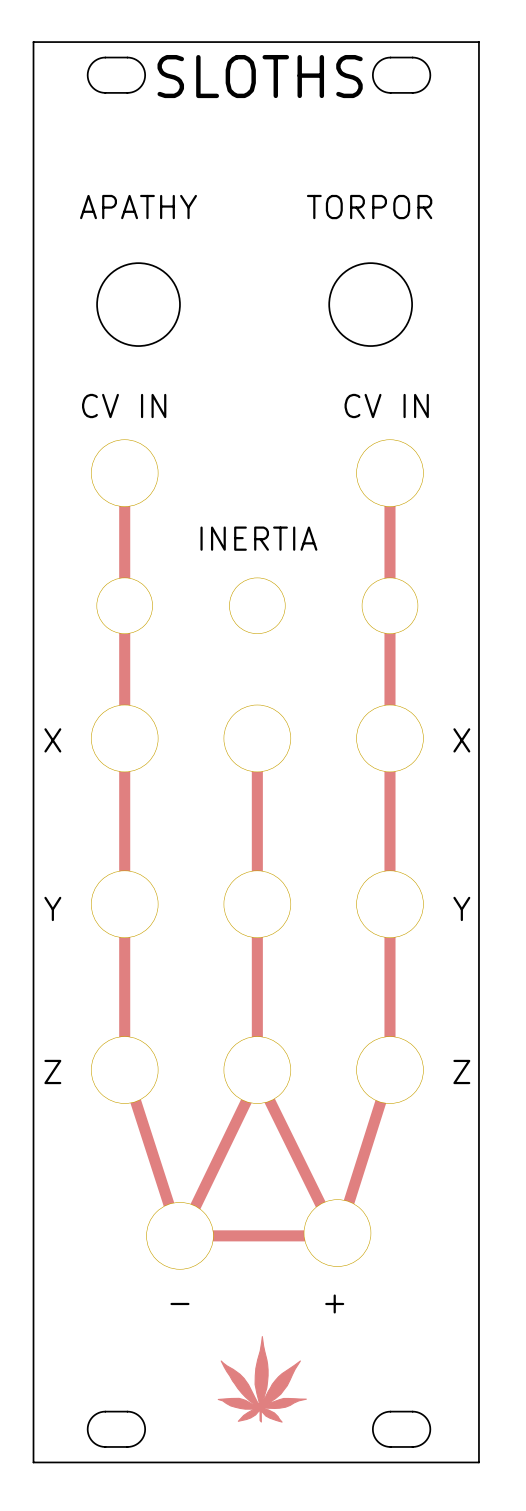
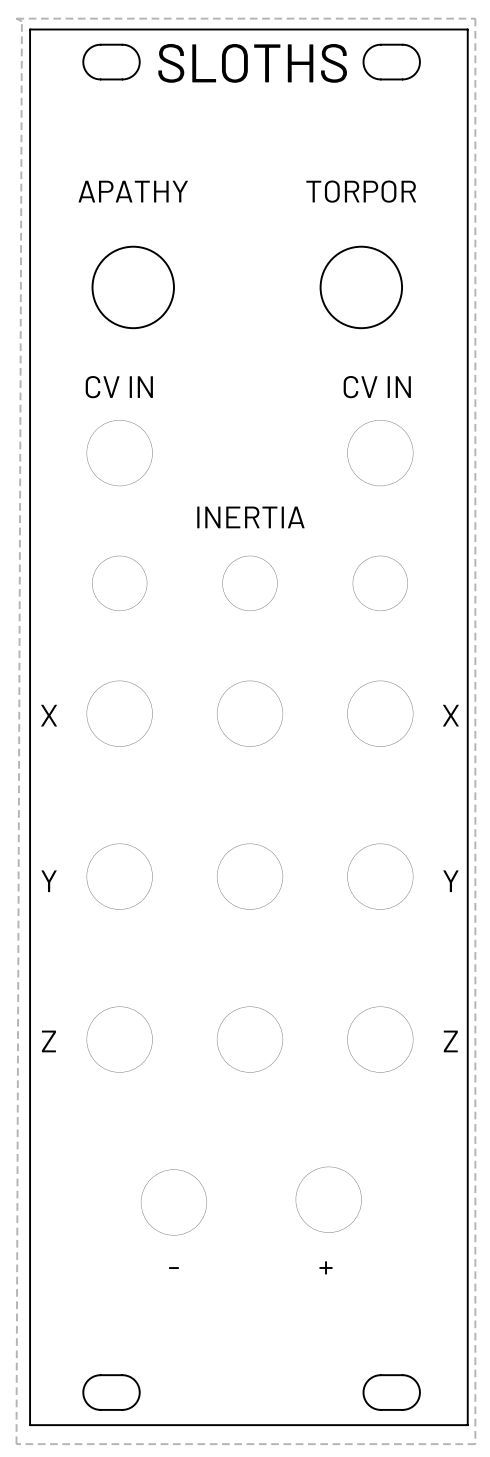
zone outline: none -> (16, 18) (21, 21) (16, 1444) (475, 1444) (475, 18) (16, 18)
track: (124, 467) (124, 1067) (179, 1238) (260, 1072) -> none
track: (389, 473) (389, 1072) (337, 1238) (257, 1075) -> none
track: (257, 738) (257, 1072) -> none
track: (179, 1235) (337, 1235) -> none
drawing: [217, 1336, 307, 1423] -> none

